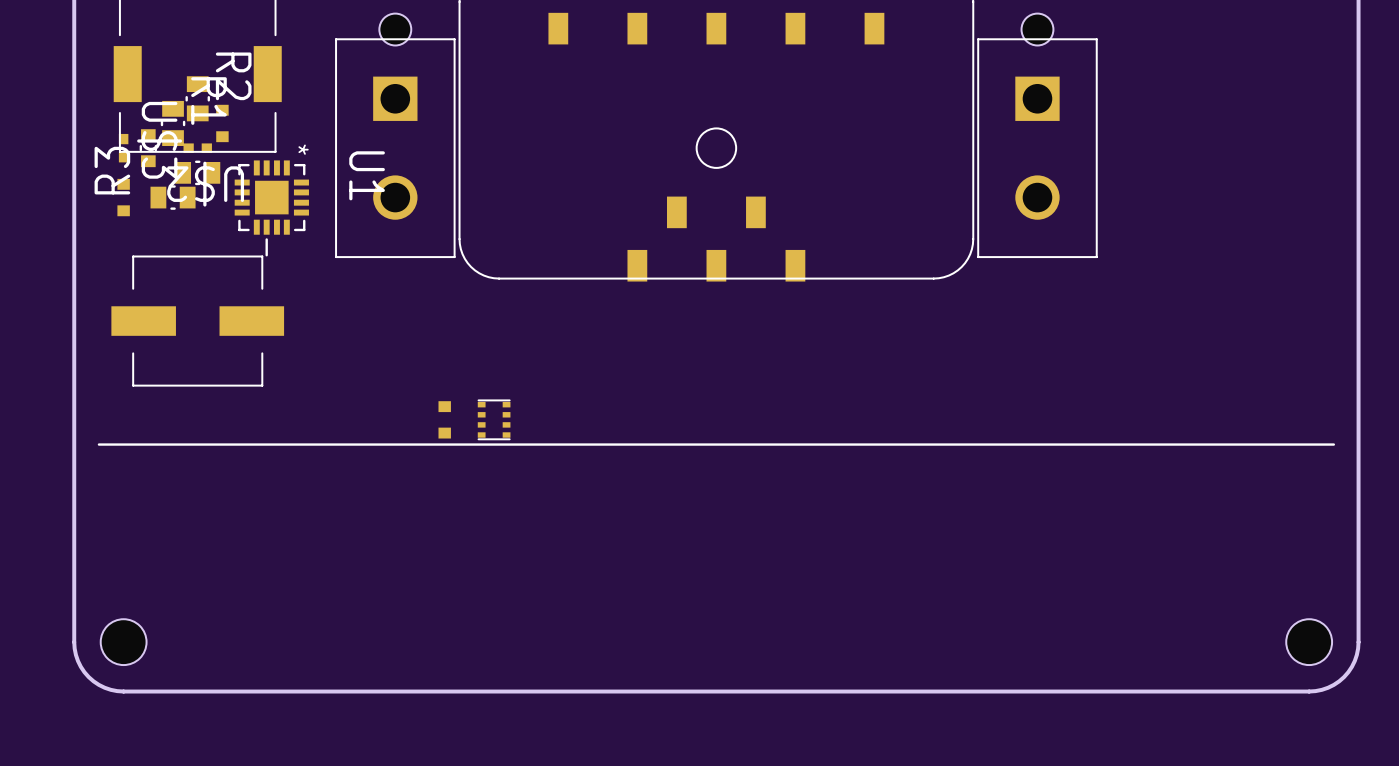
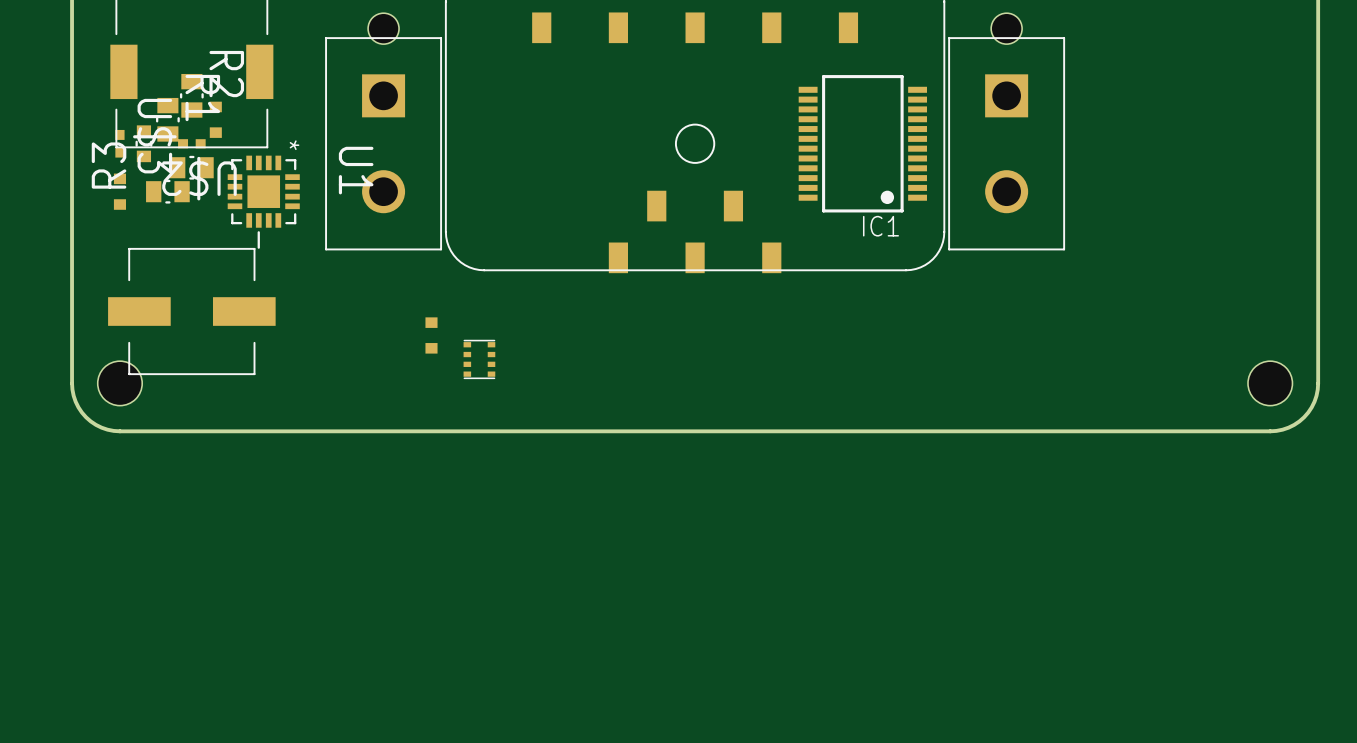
IC1: none -> (862, 143)
board edge: (74, 395) (74, 648) (78, 661) (88, 677) (104, 687) (123, 691) (1309, 691) (1321, 689) (1333, 684) (1344, 677) (1354, 661) (1358, 648) (1358, 395) -> (72, 383) (75, 401) (86, 417) (101, 427) (119, 431) (1270, 431) (1288, 427) (1304, 417) (1314, 401) (1318, 383)
part position: (444, 419) -> (431, 335)
part position: (494, 419) -> (479, 359)
line: (98, 444) (1333, 444) -> none
hole position: (123, 642) -> (119, 383)
hole position: (1309, 642) -> (1270, 383)

